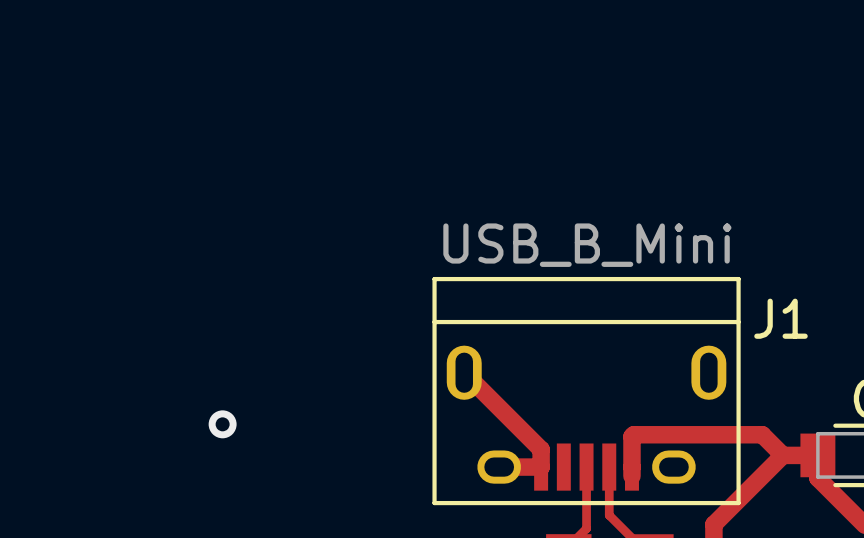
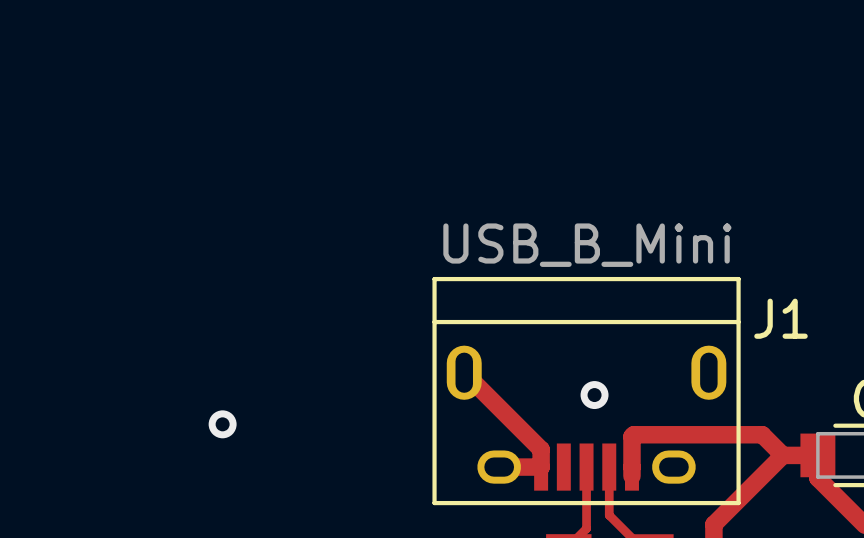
via: none -> (594, 395)

